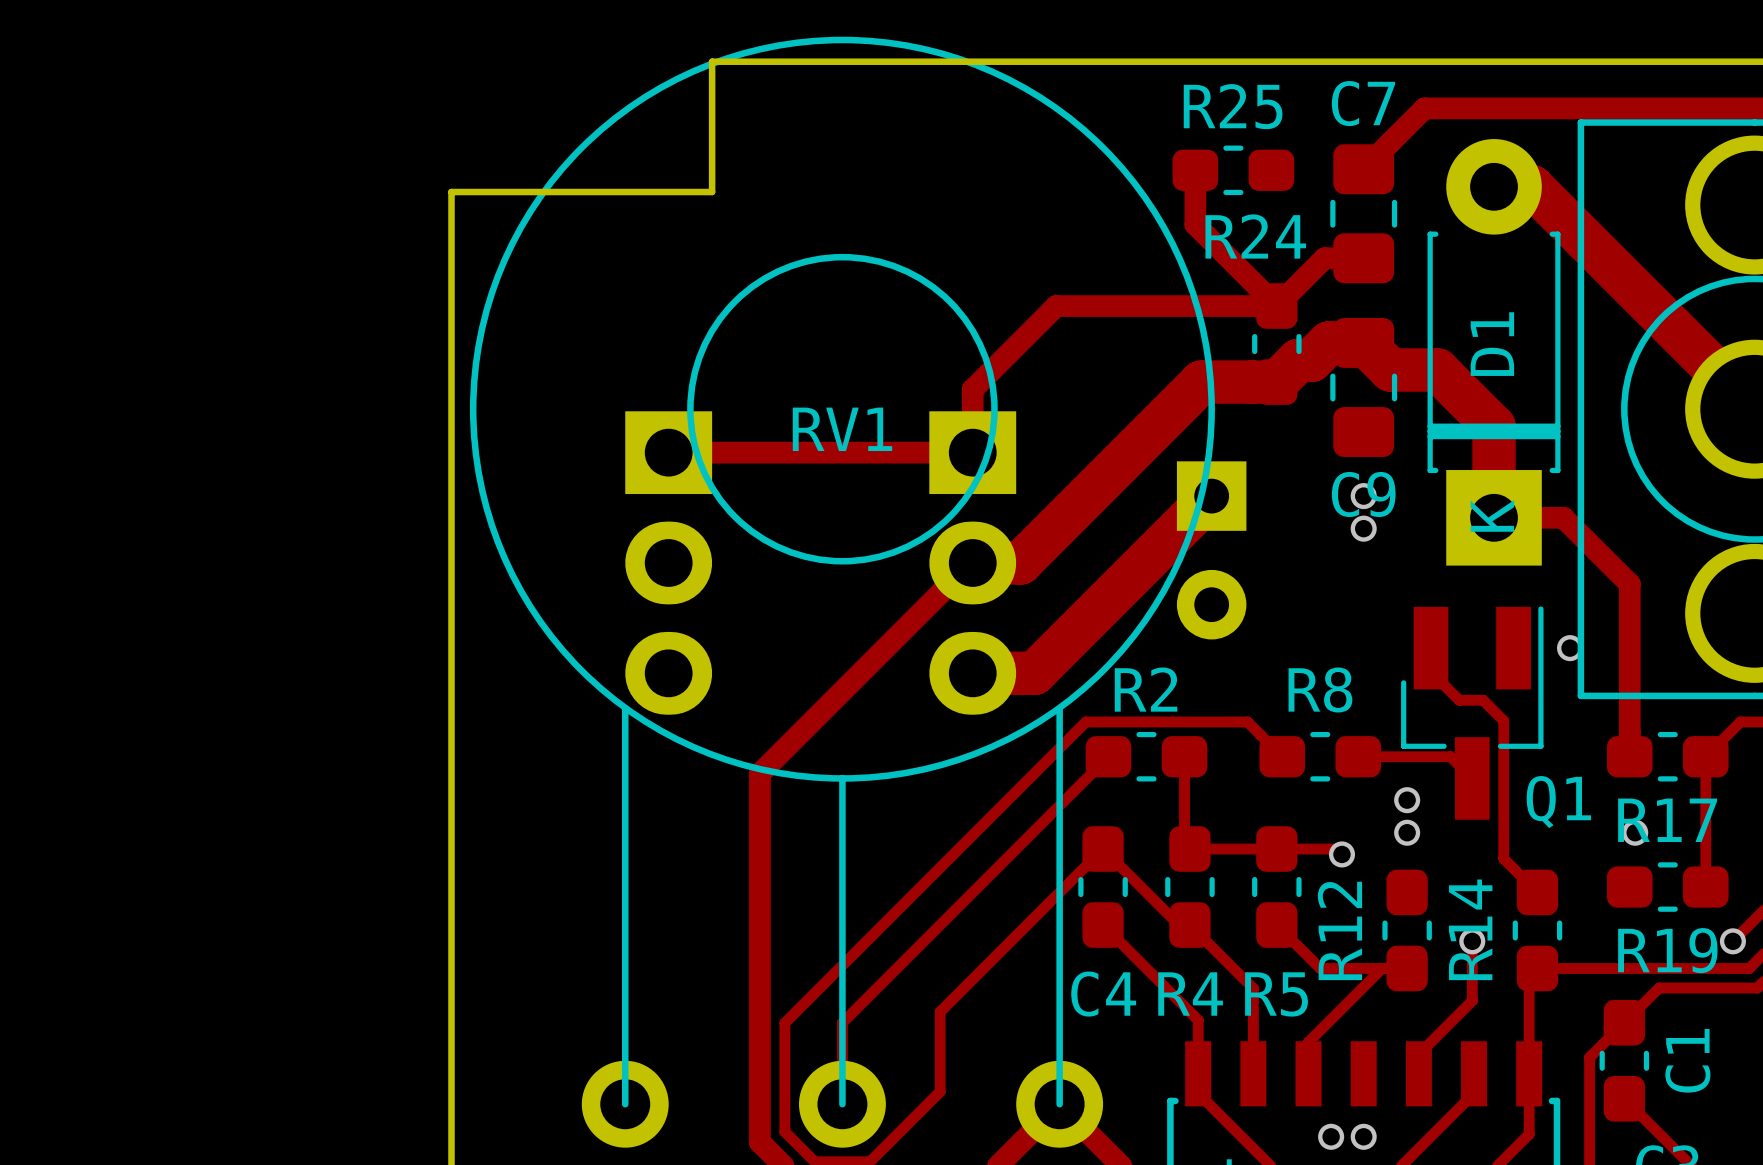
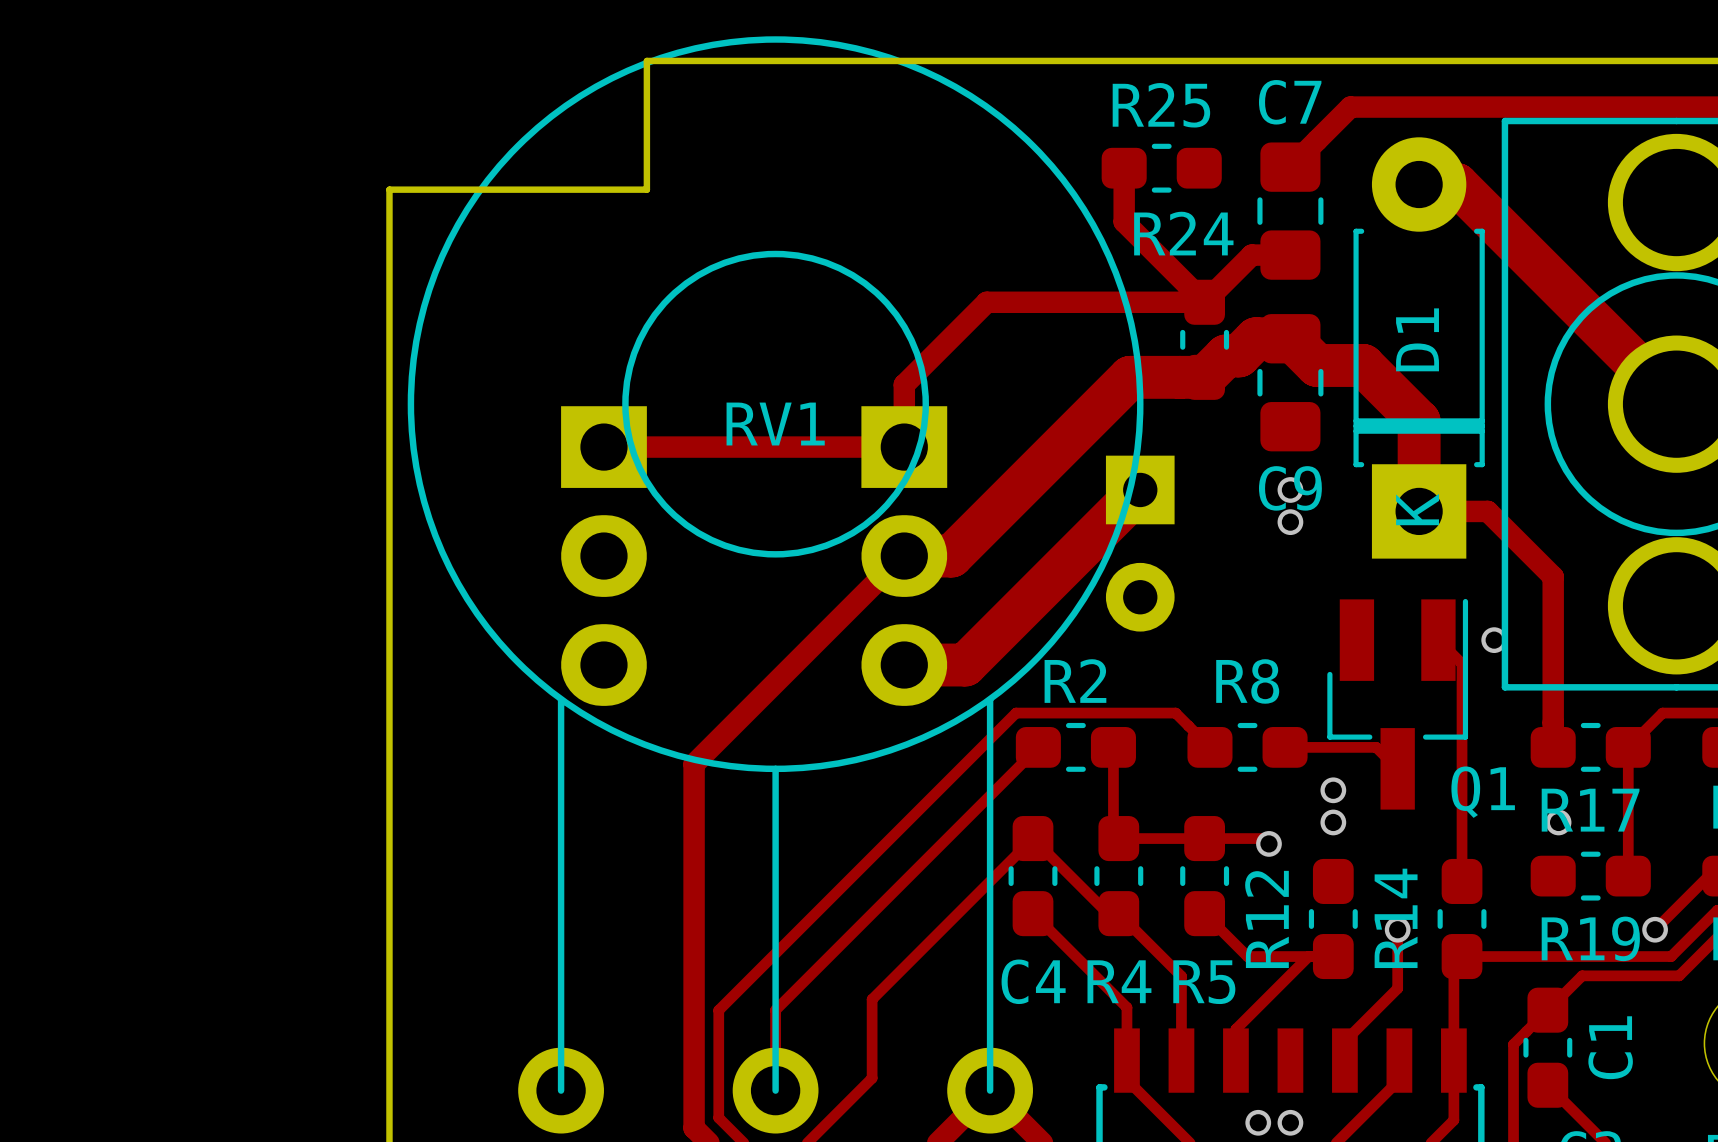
track: (1431, 672) (1459, 700) (1483, 700) (1503, 720) (1503, 858) (1537, 892) -> (1438, 640) (1462, 663) (1462, 881)

